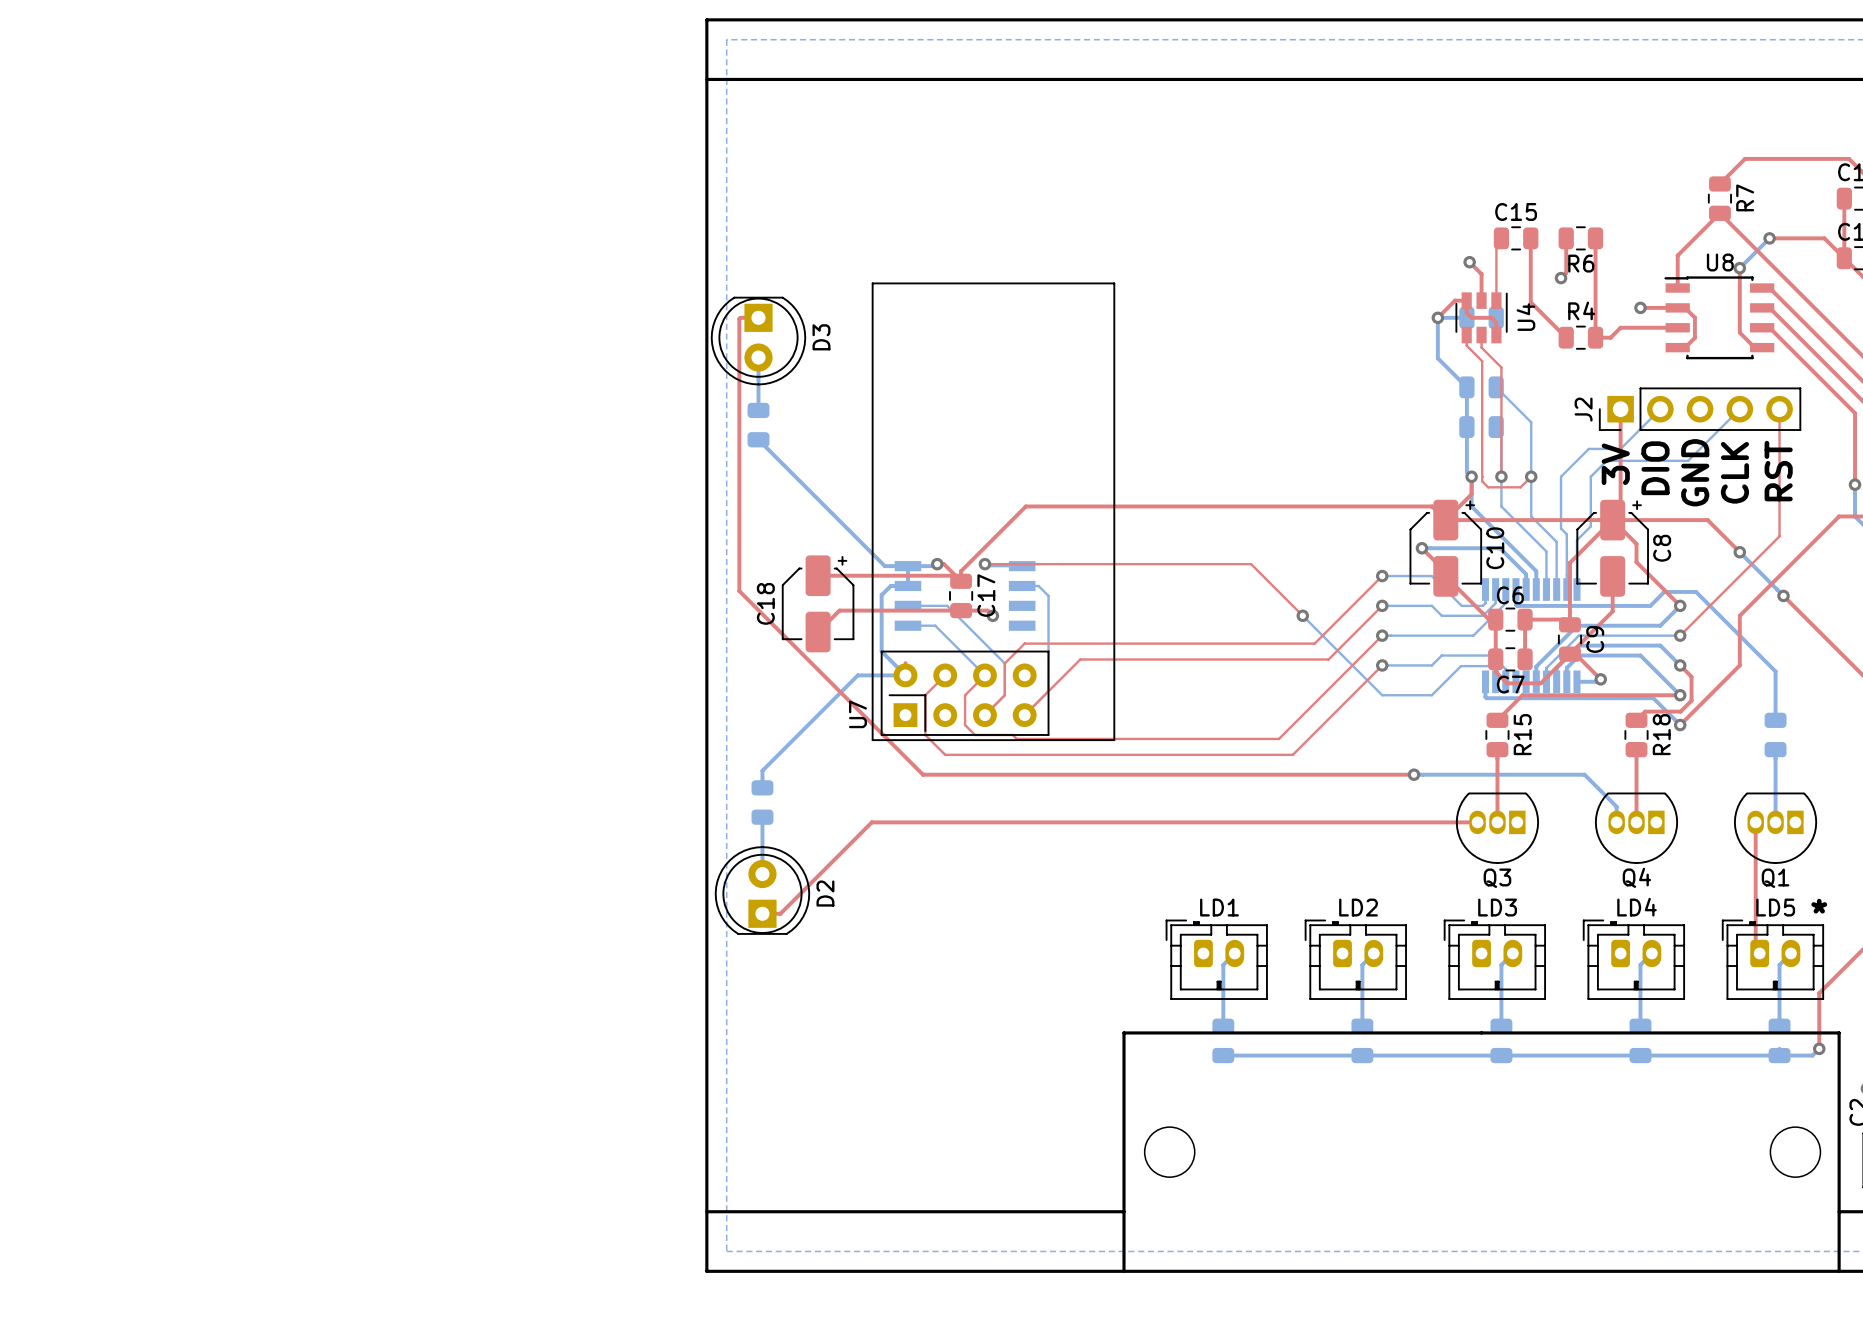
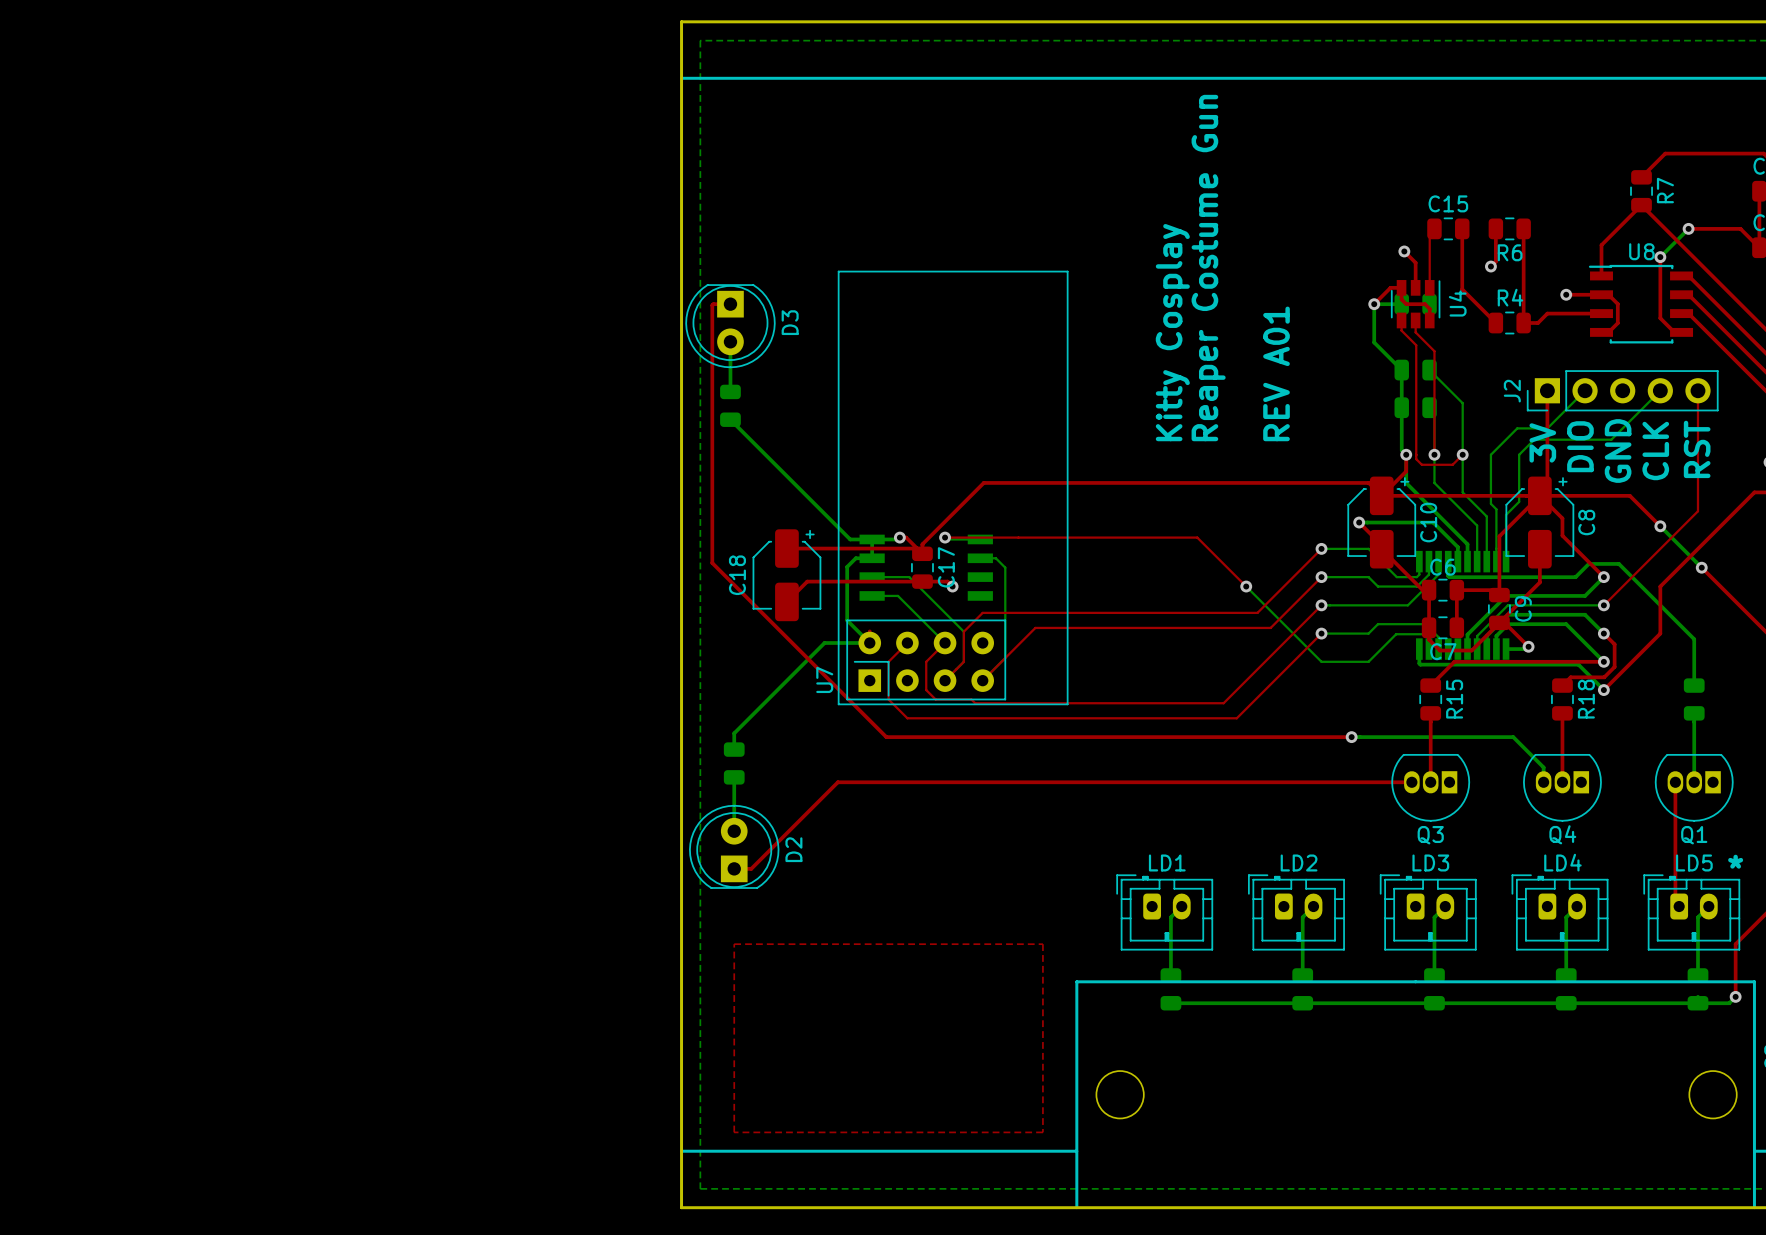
text: none -> Reaper Costume Gun (1208, 268)
text: none -> Kitty Cosplay (1172, 332)
text: none -> REV A01 (1276, 373)
top zone outline: none -> (734, 944) (1042, 944) (1042, 1132) (734, 1132) (734, 944)

